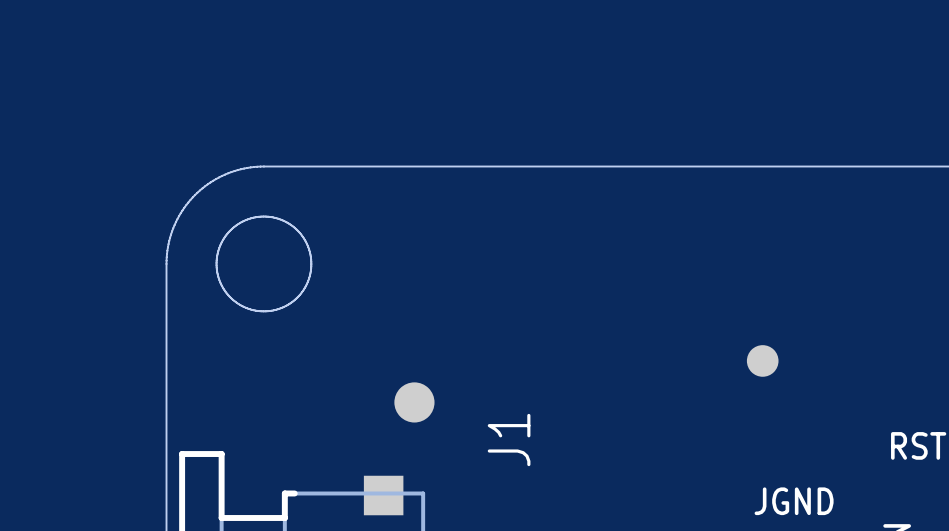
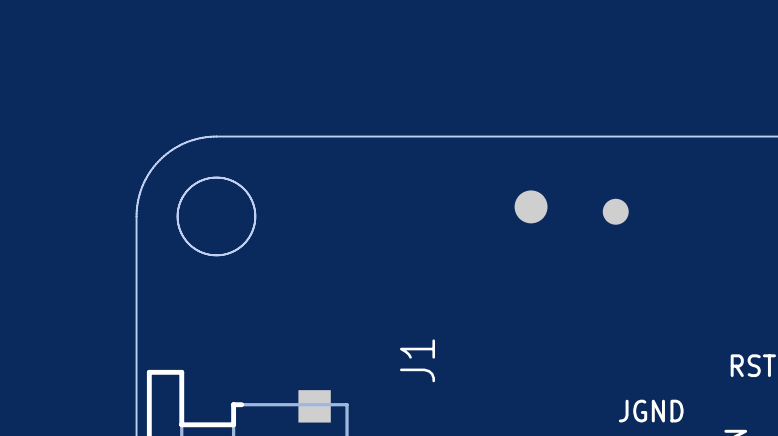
part position: (762, 360) -> (615, 211)
part position: (414, 402) -> (531, 206)

